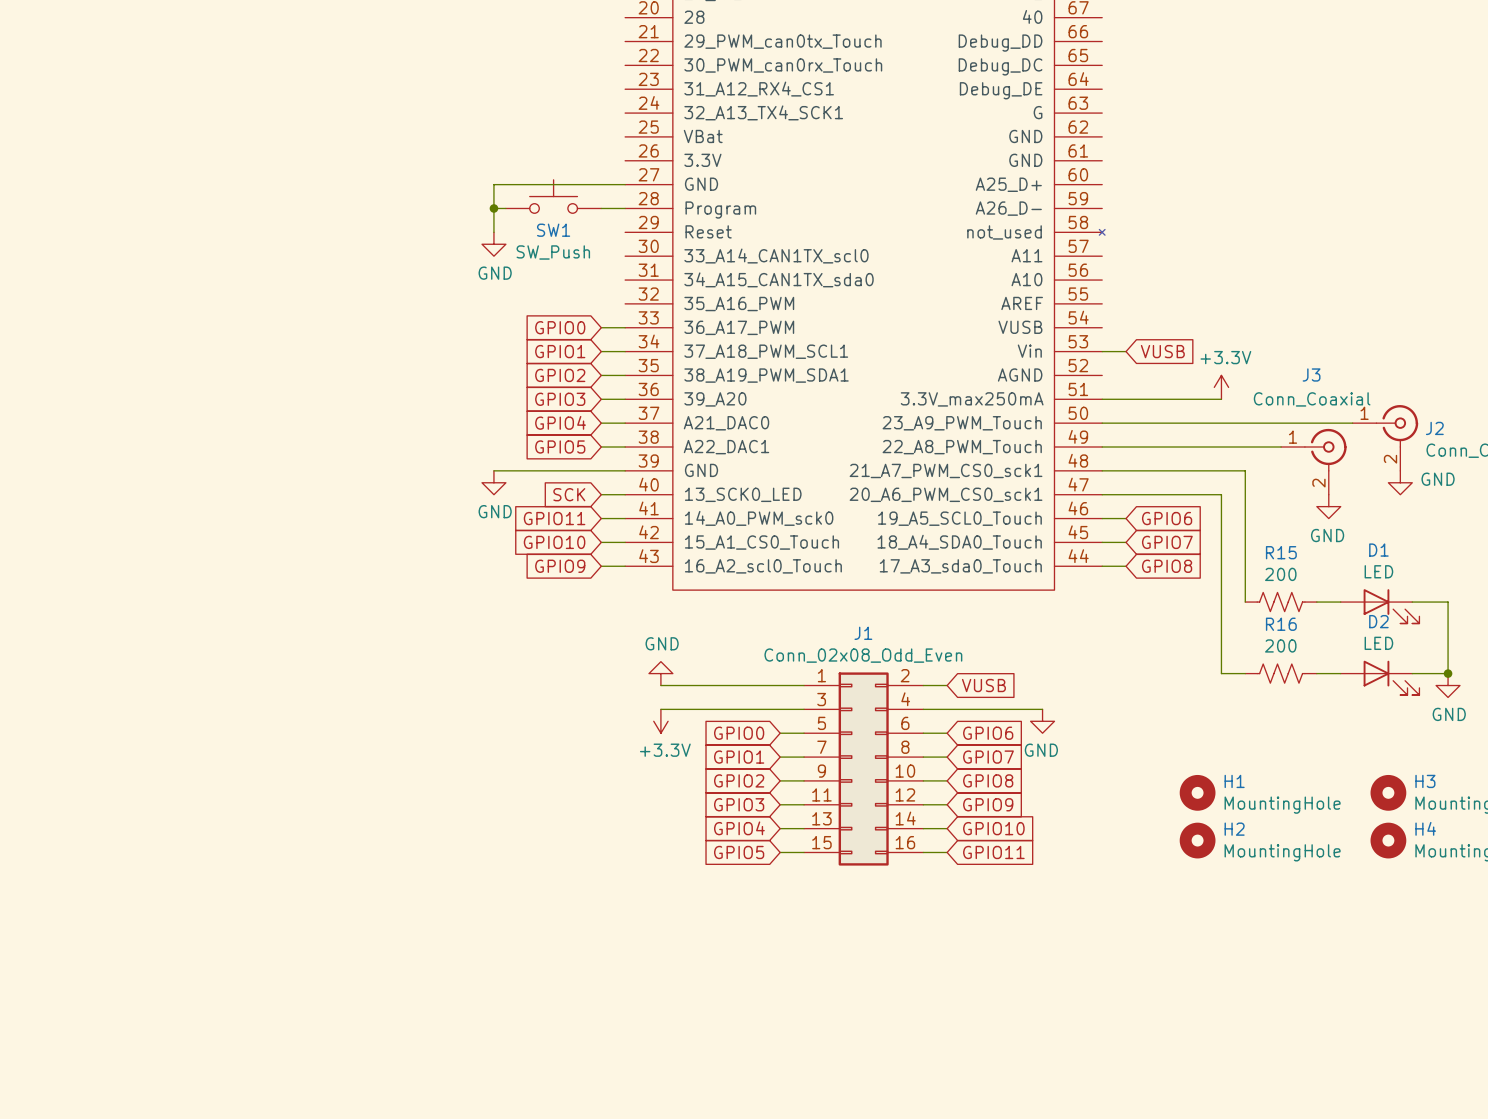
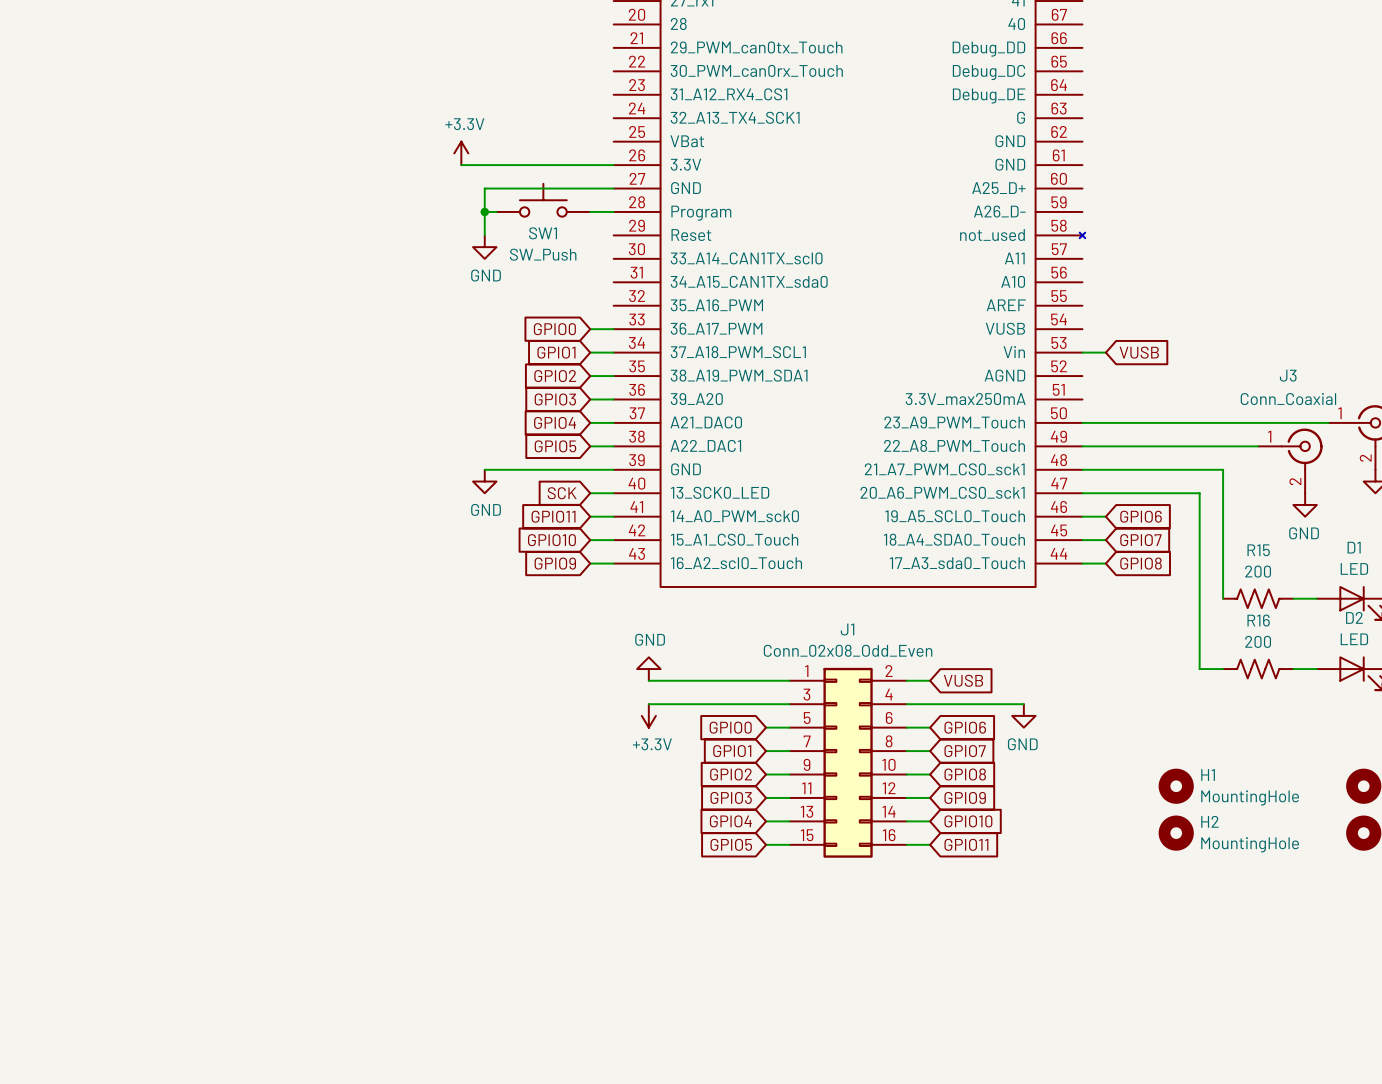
power symbol: none -> +3.3V (461, 153)
wire: none -> (461, 165) (613, 165)
power symbol: +3.3V (1221, 387) -> none
wire: (1102, 399) (1221, 399) -> none

